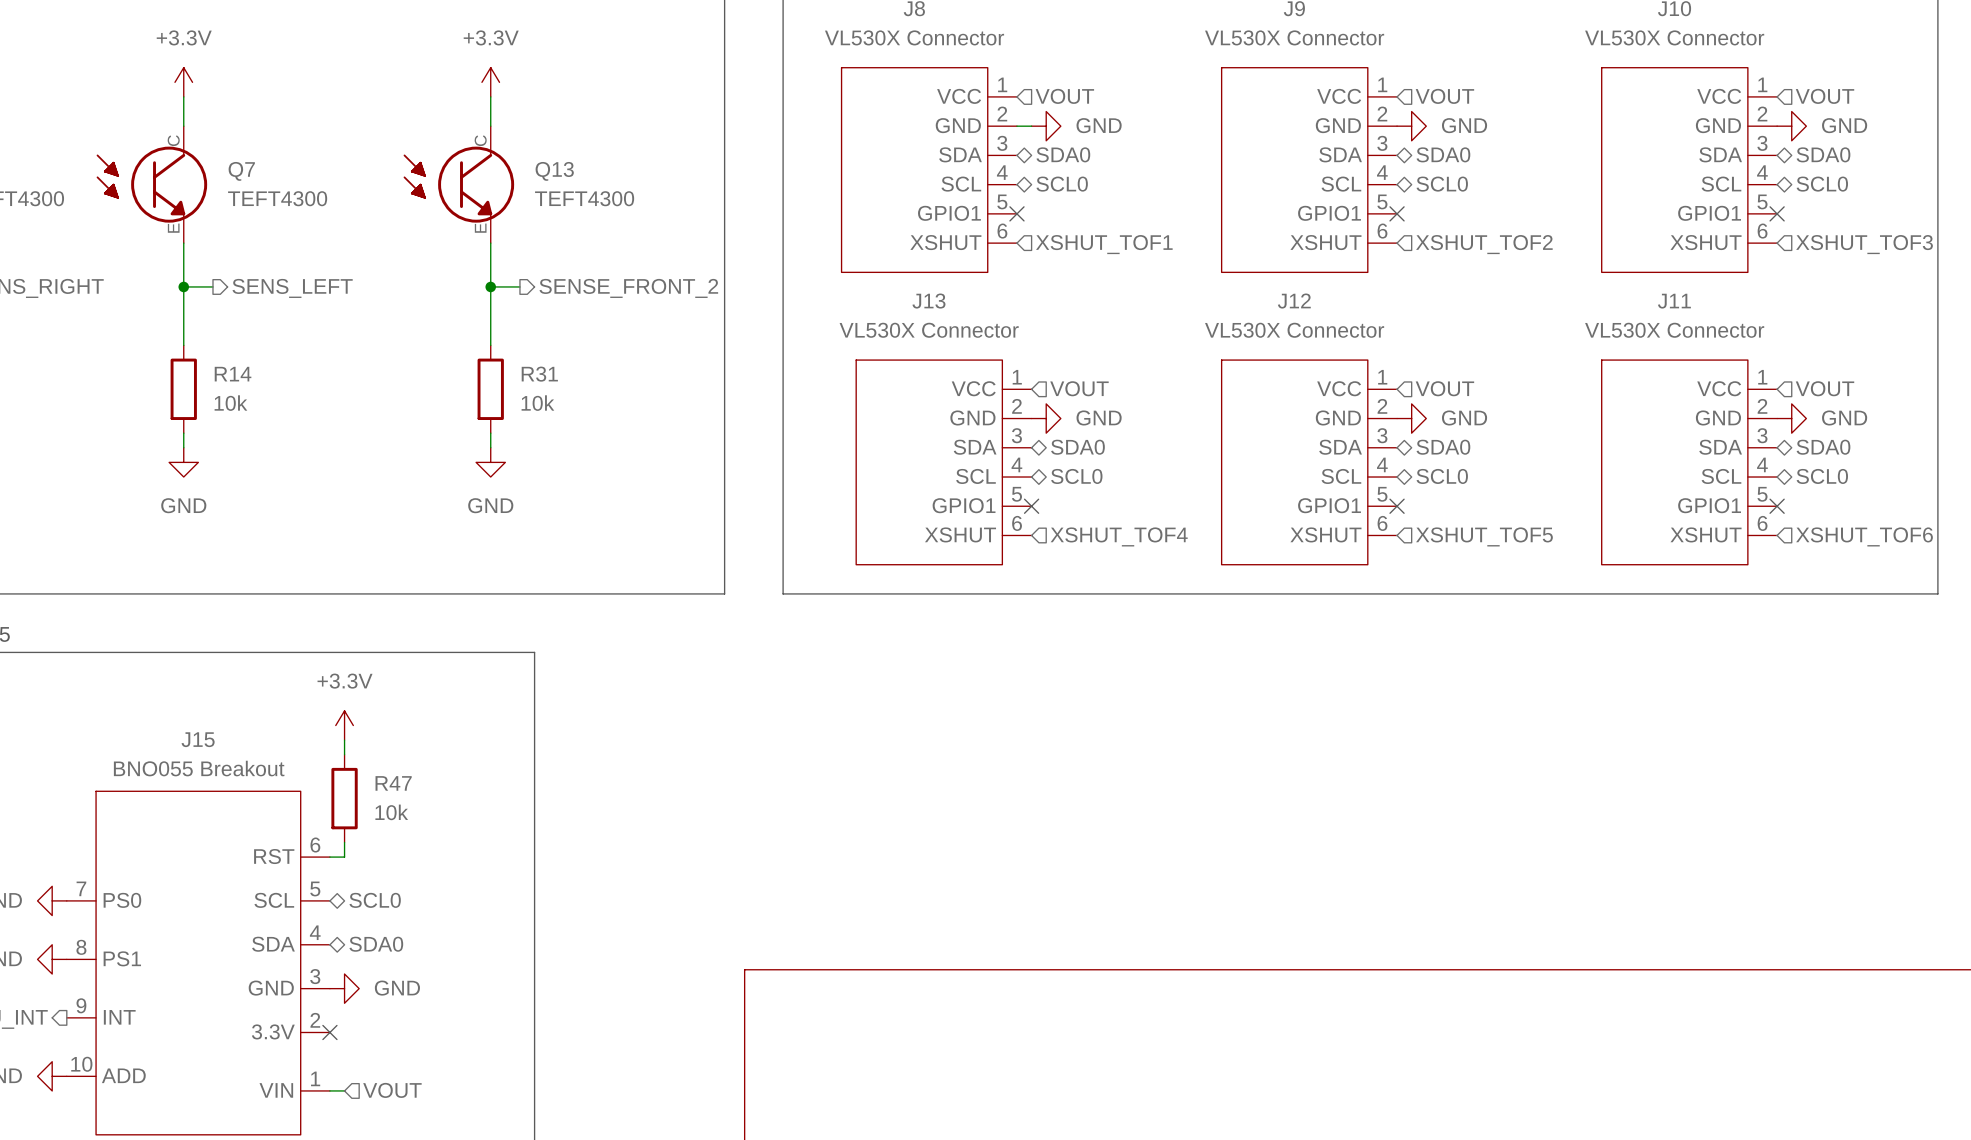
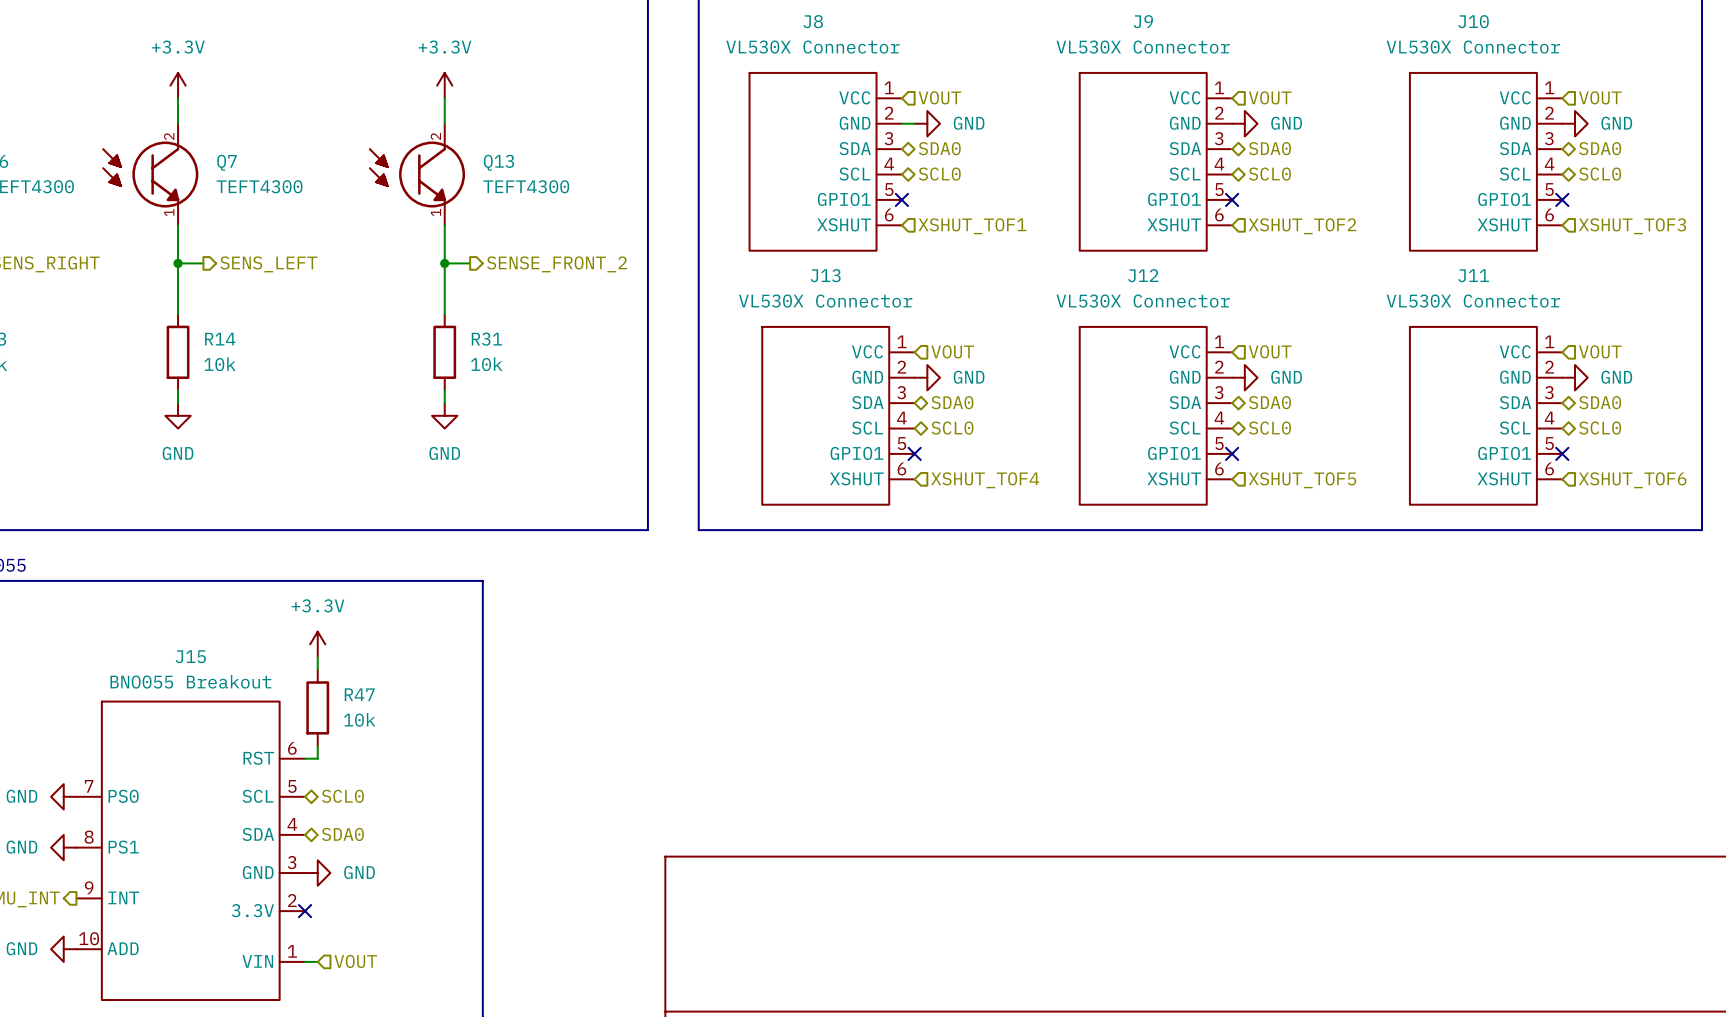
Q7 pin number: C (173, 140) -> 2 (169, 136)
Q13 pin number: C (480, 140) -> 2 (435, 136)
Q7 pin number: E (173, 228) -> 1 (169, 212)
Q13 pin number: E (480, 228) -> 1 (436, 212)

